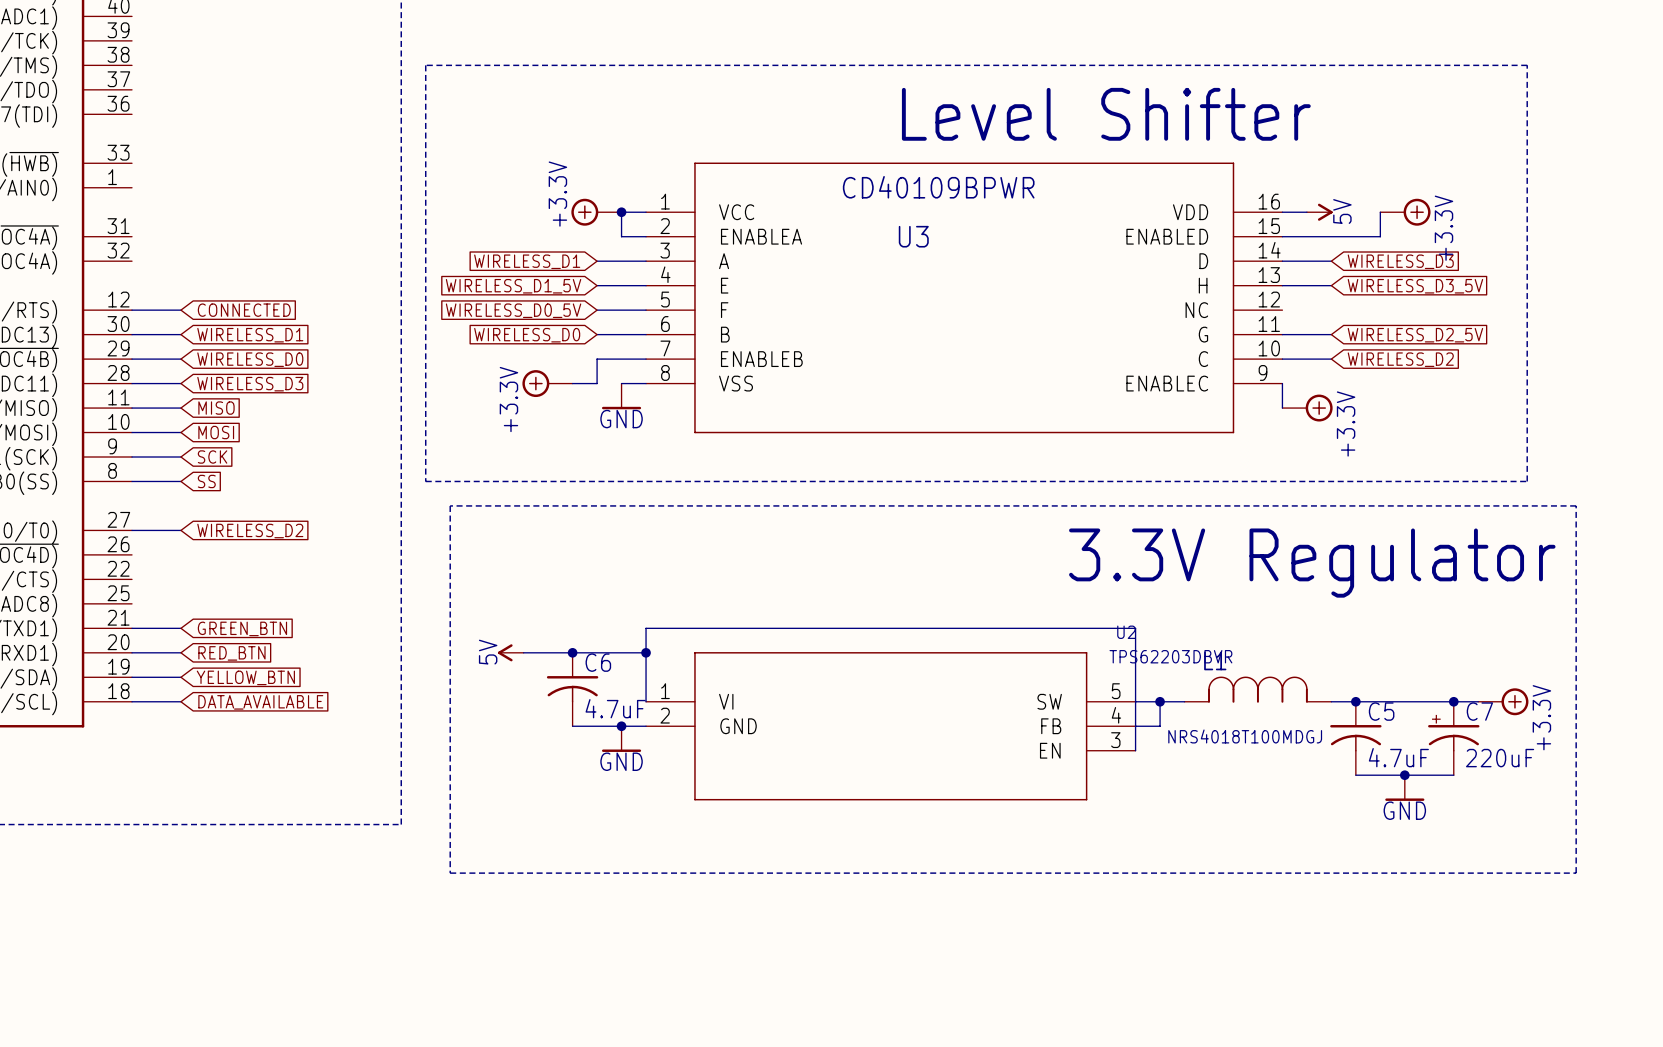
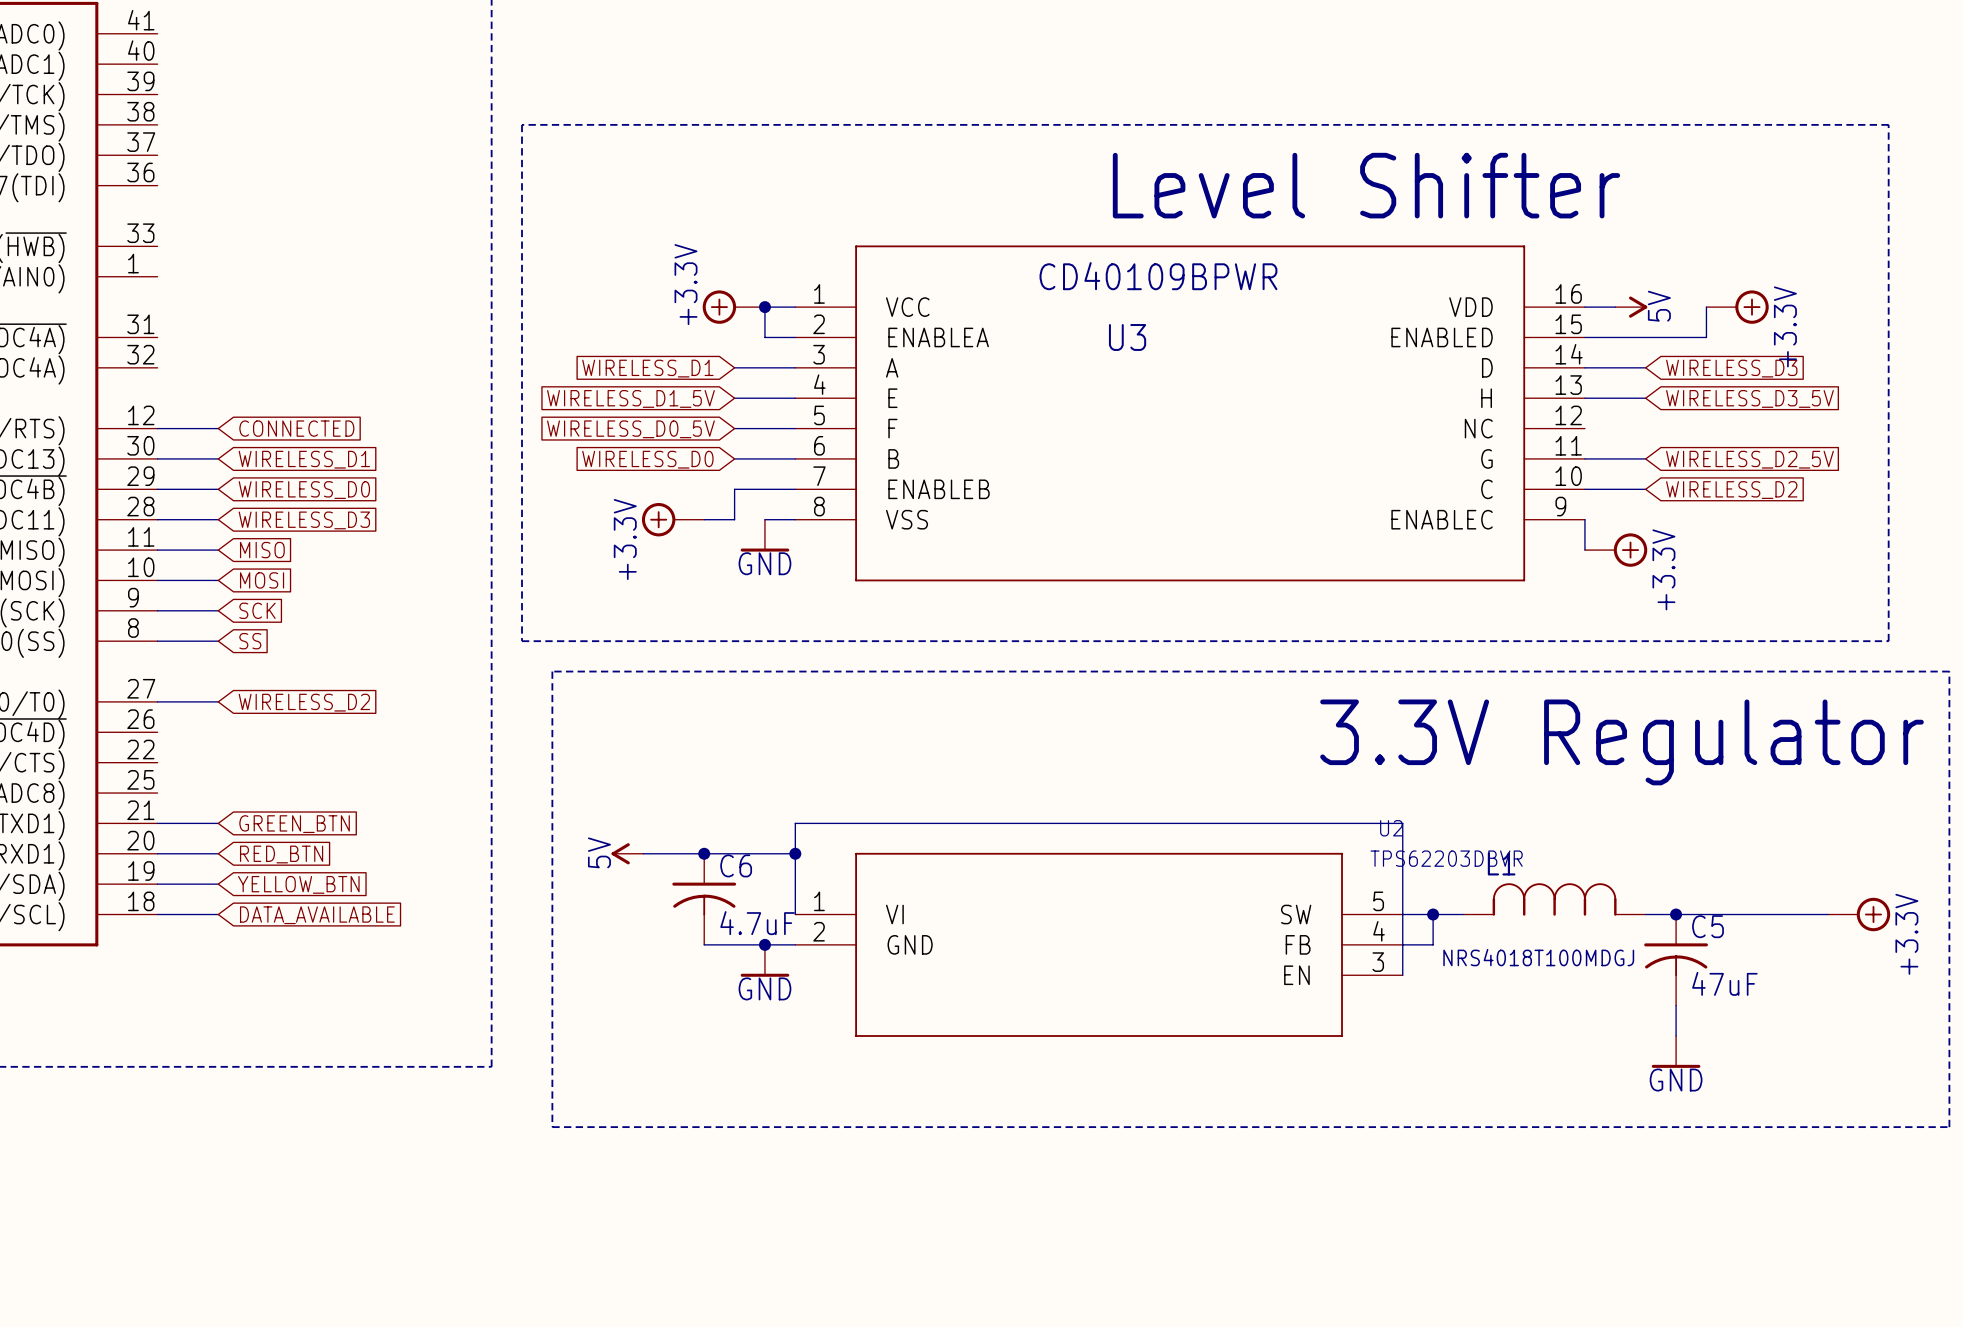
junction: (1453, 701) -> none
C7: 220uF (1453, 738) -> none
C5 value: 4.7uF (1398, 757) -> 47uF (1724, 983)
wire: (1355, 775) (1453, 775) -> (1676, 1005) (1676, 1035)
junction: (1404, 775) -> none
power symbol position: GND (1404, 788) -> GND (1676, 1051)

